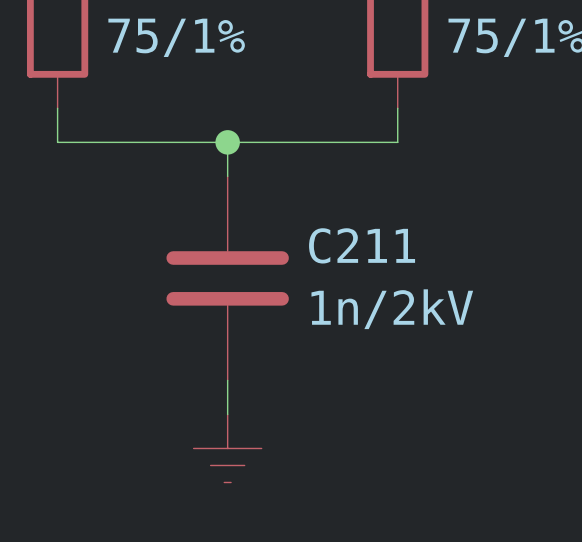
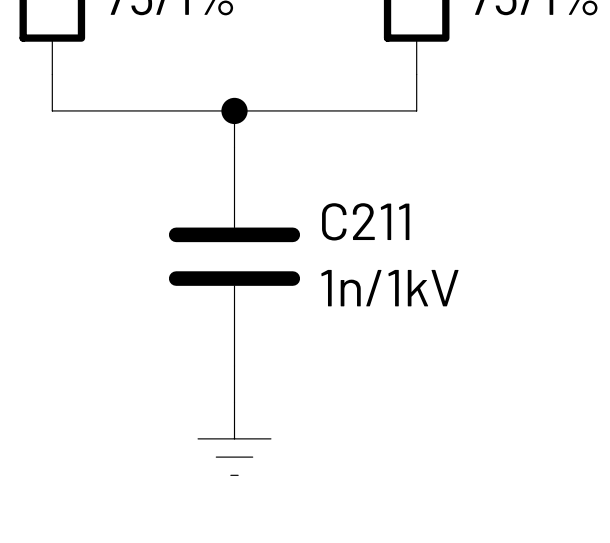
C211 value: 1n/2kV (392, 309) -> 1n/1kV (389, 288)

